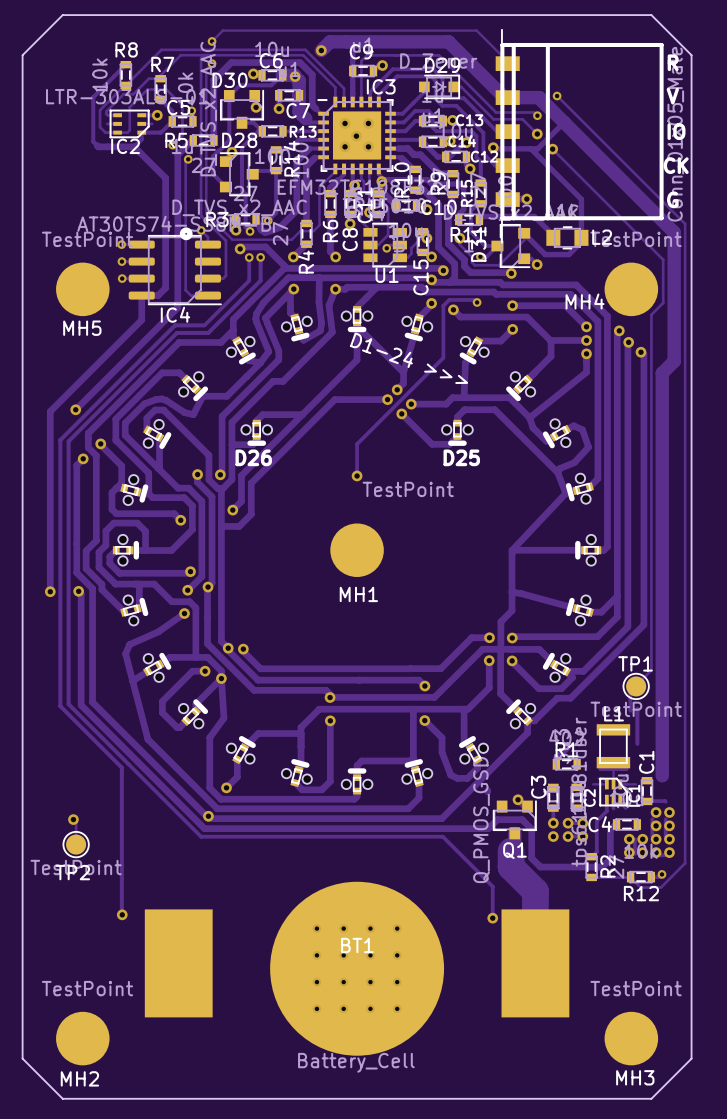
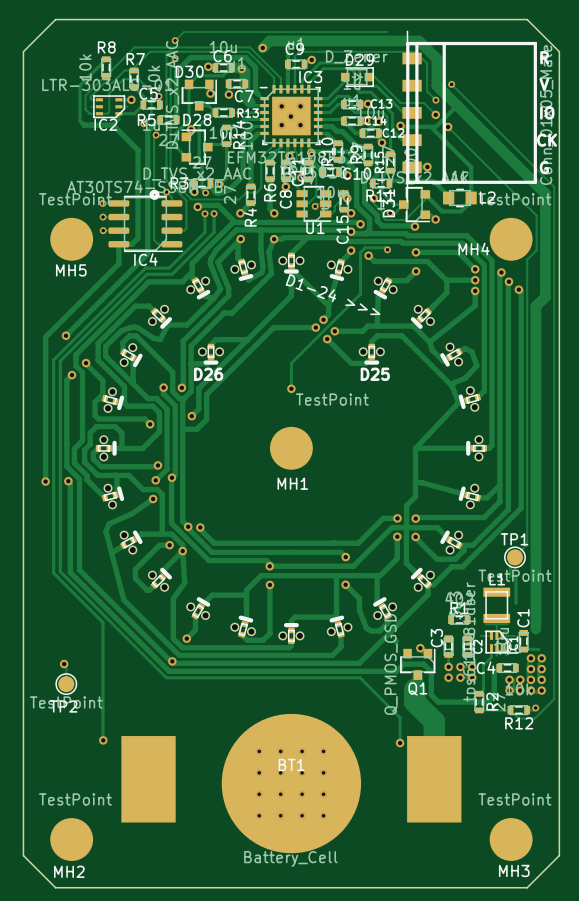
track: (476, 30) (509, 63) -> none
track: (448, 41) (504, 97) (538, 97) -> (364, 41) (419, 41) (436, 58) (436, 85)
track: (438, 55) (496, 112) (534, 112) -> (357, 51) (415, 51) (427, 63) (427, 91) (433, 97)

